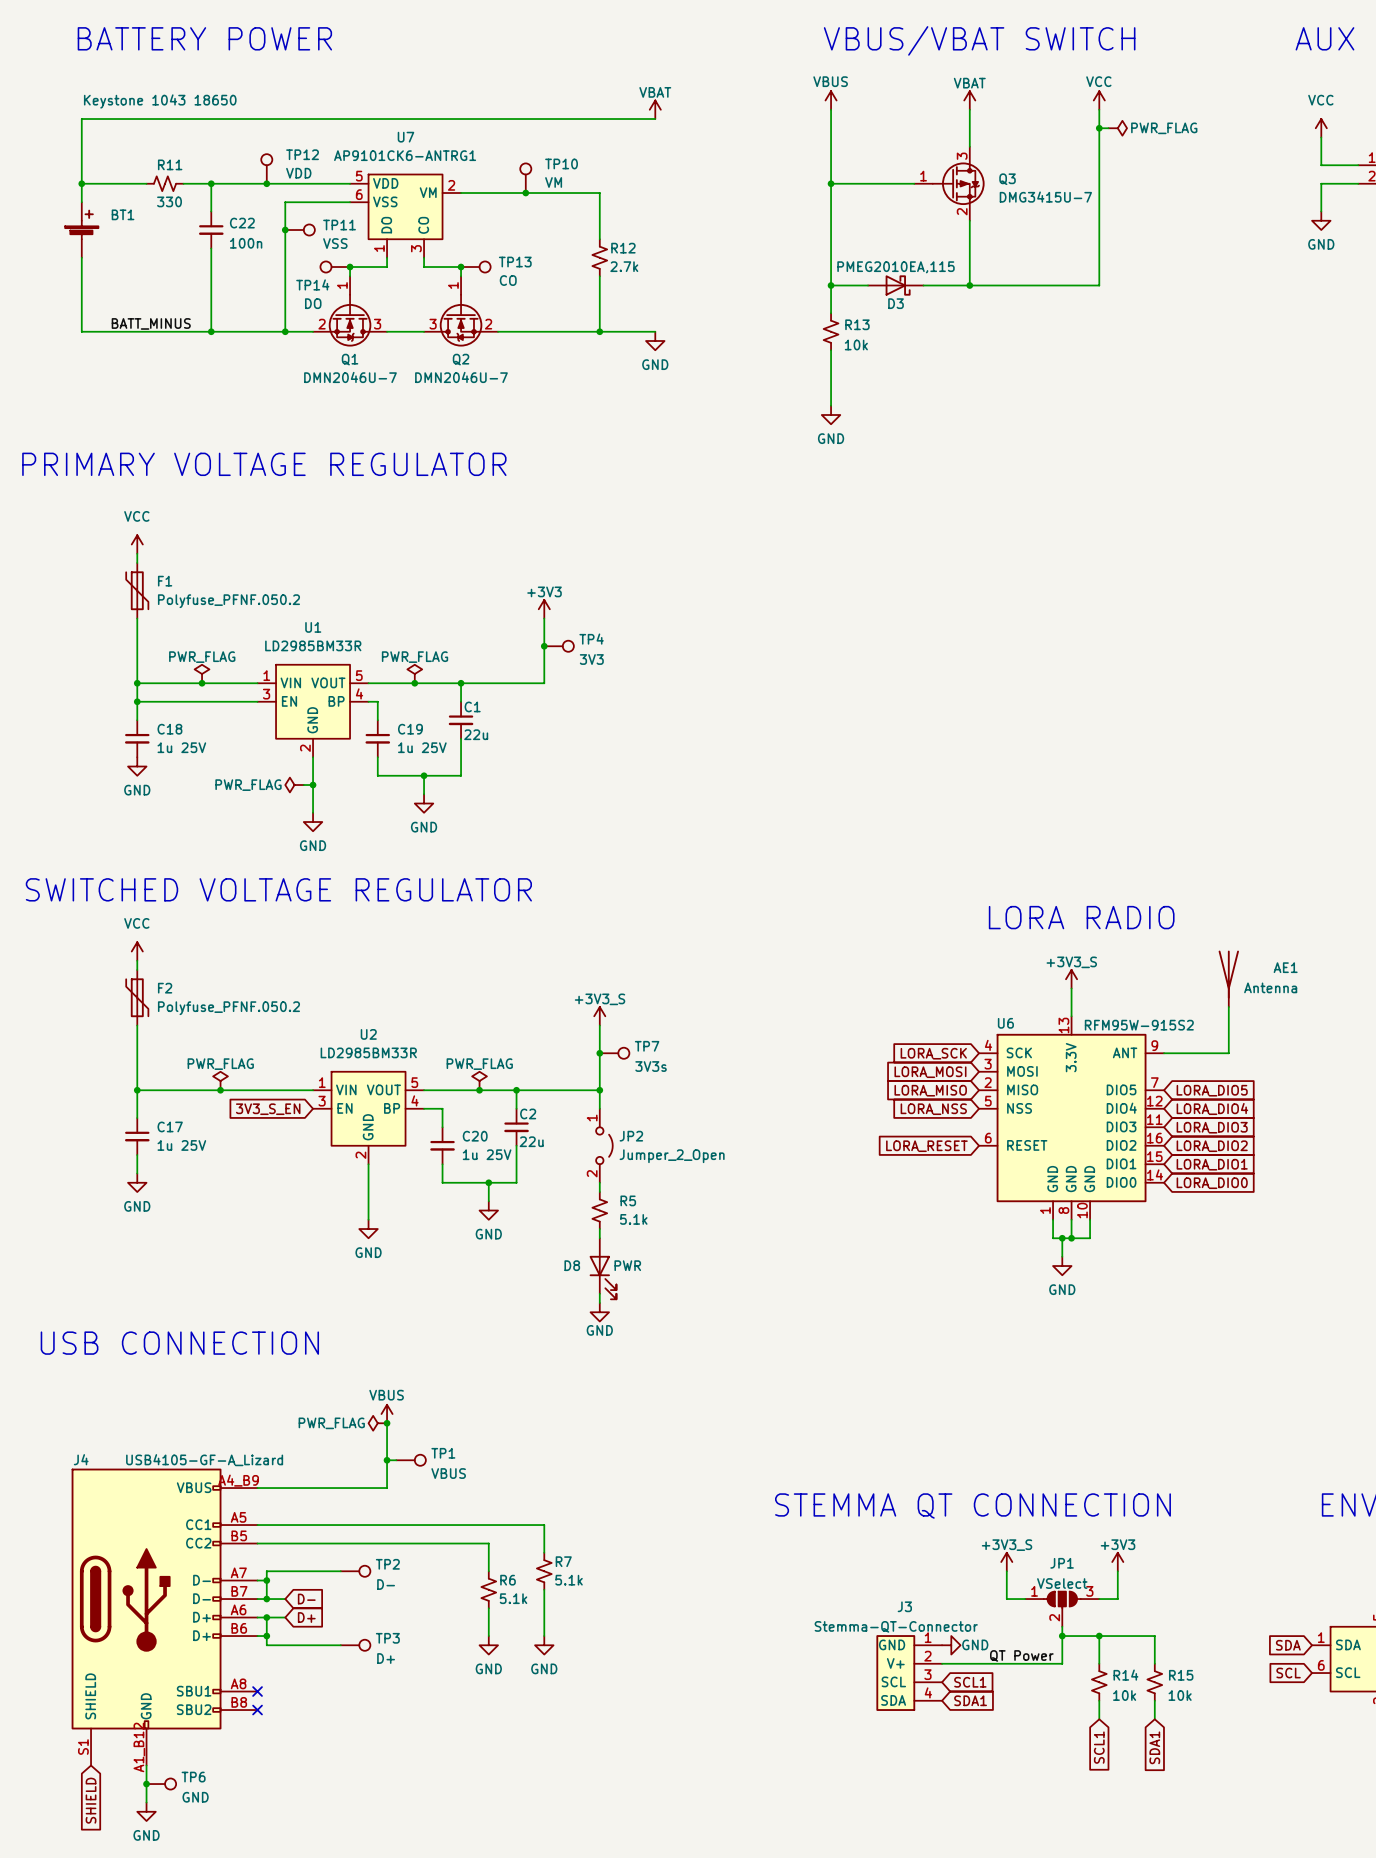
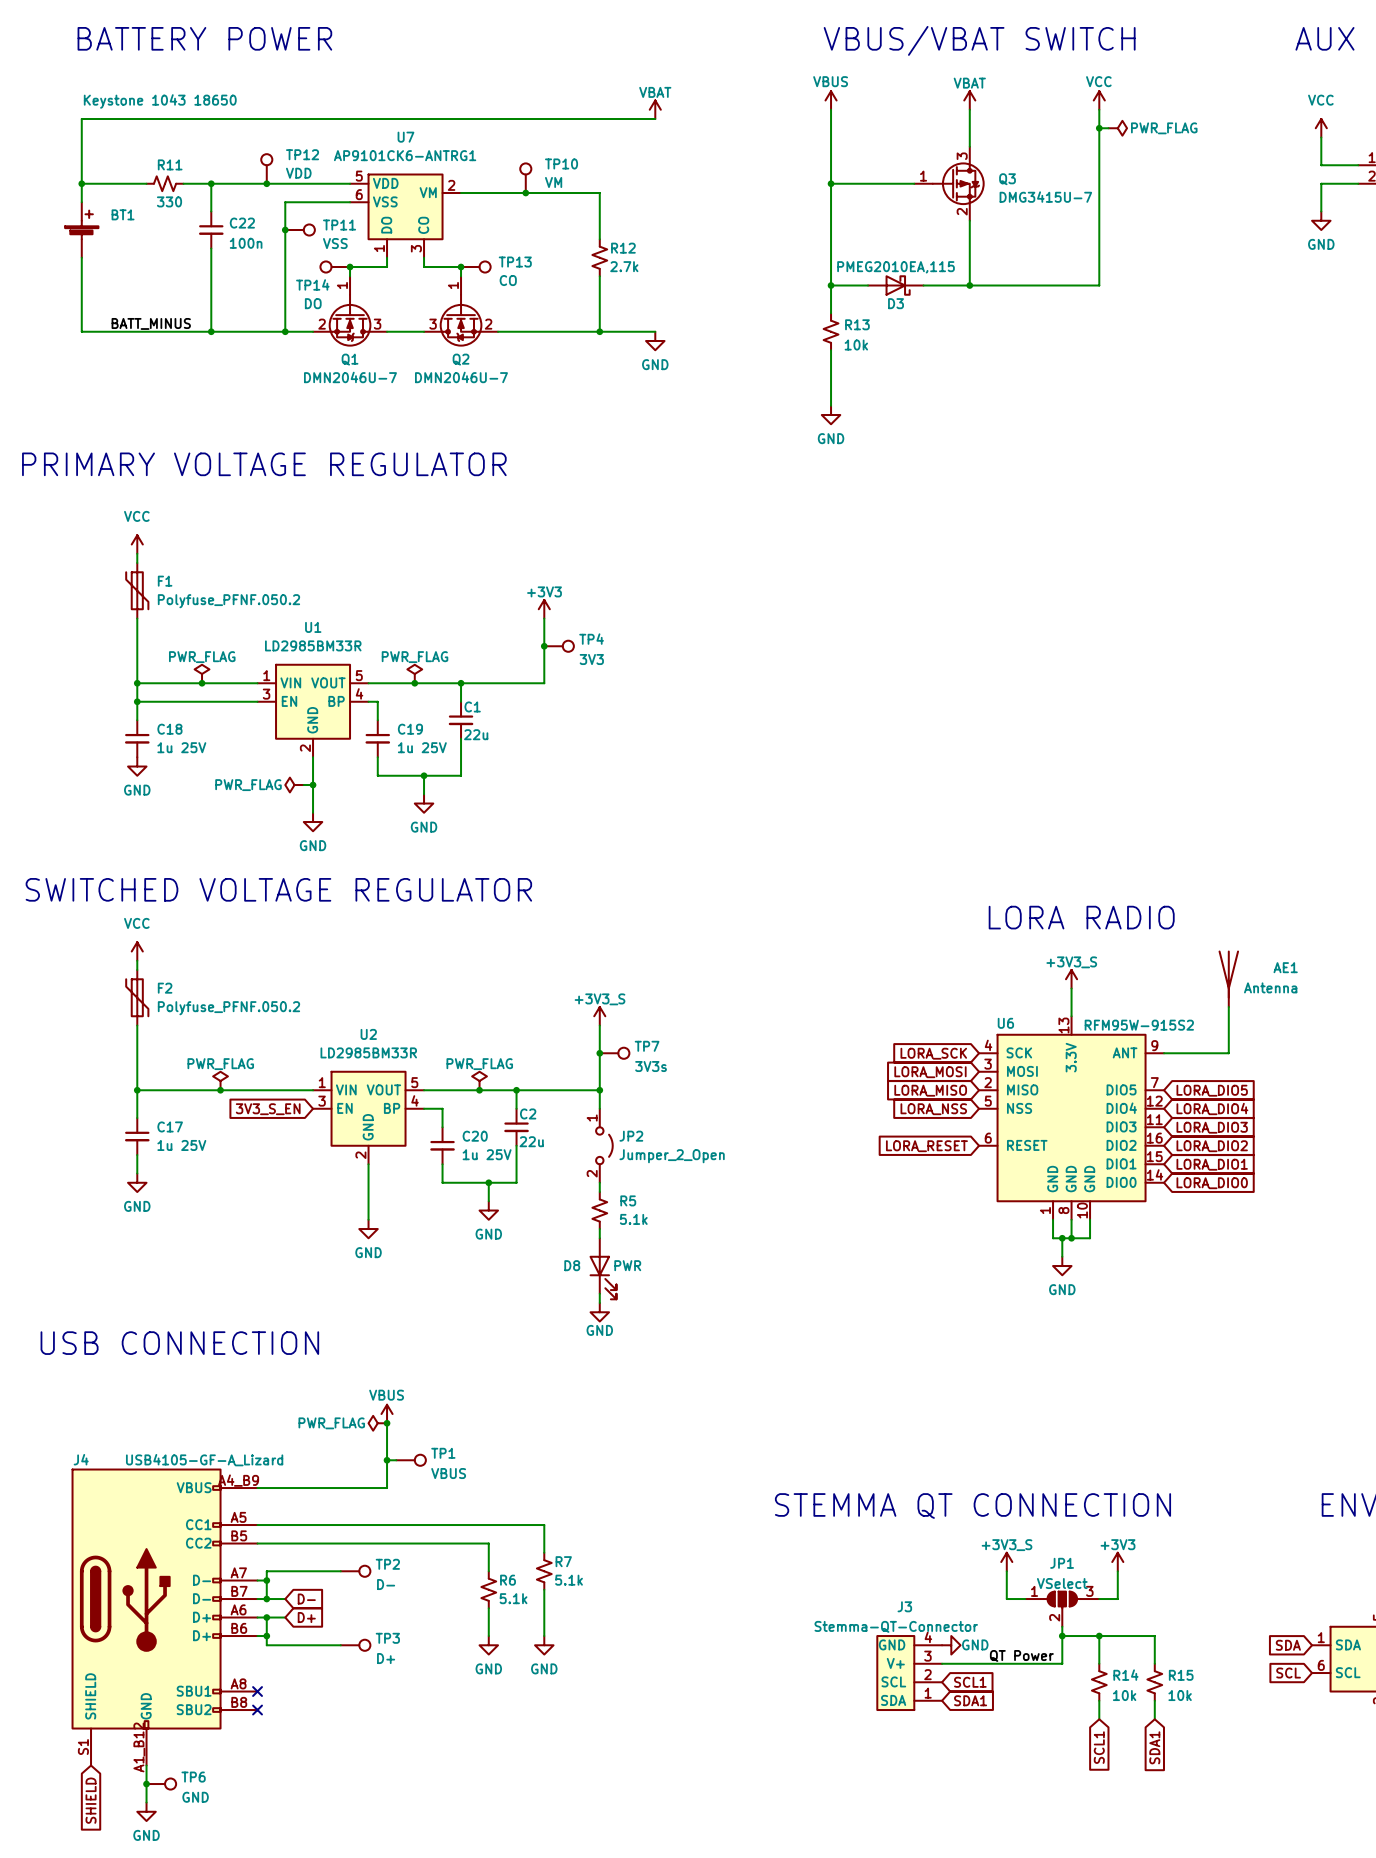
J3 pin number: 1 (928, 1637) -> 4 (928, 1637)
J3 pin number: 2 (927, 1656) -> 3 (927, 1656)
J3 pin number: 3 (927, 1674) -> 2 (927, 1674)
J3 pin number: 4 (928, 1692) -> 1 (928, 1693)

